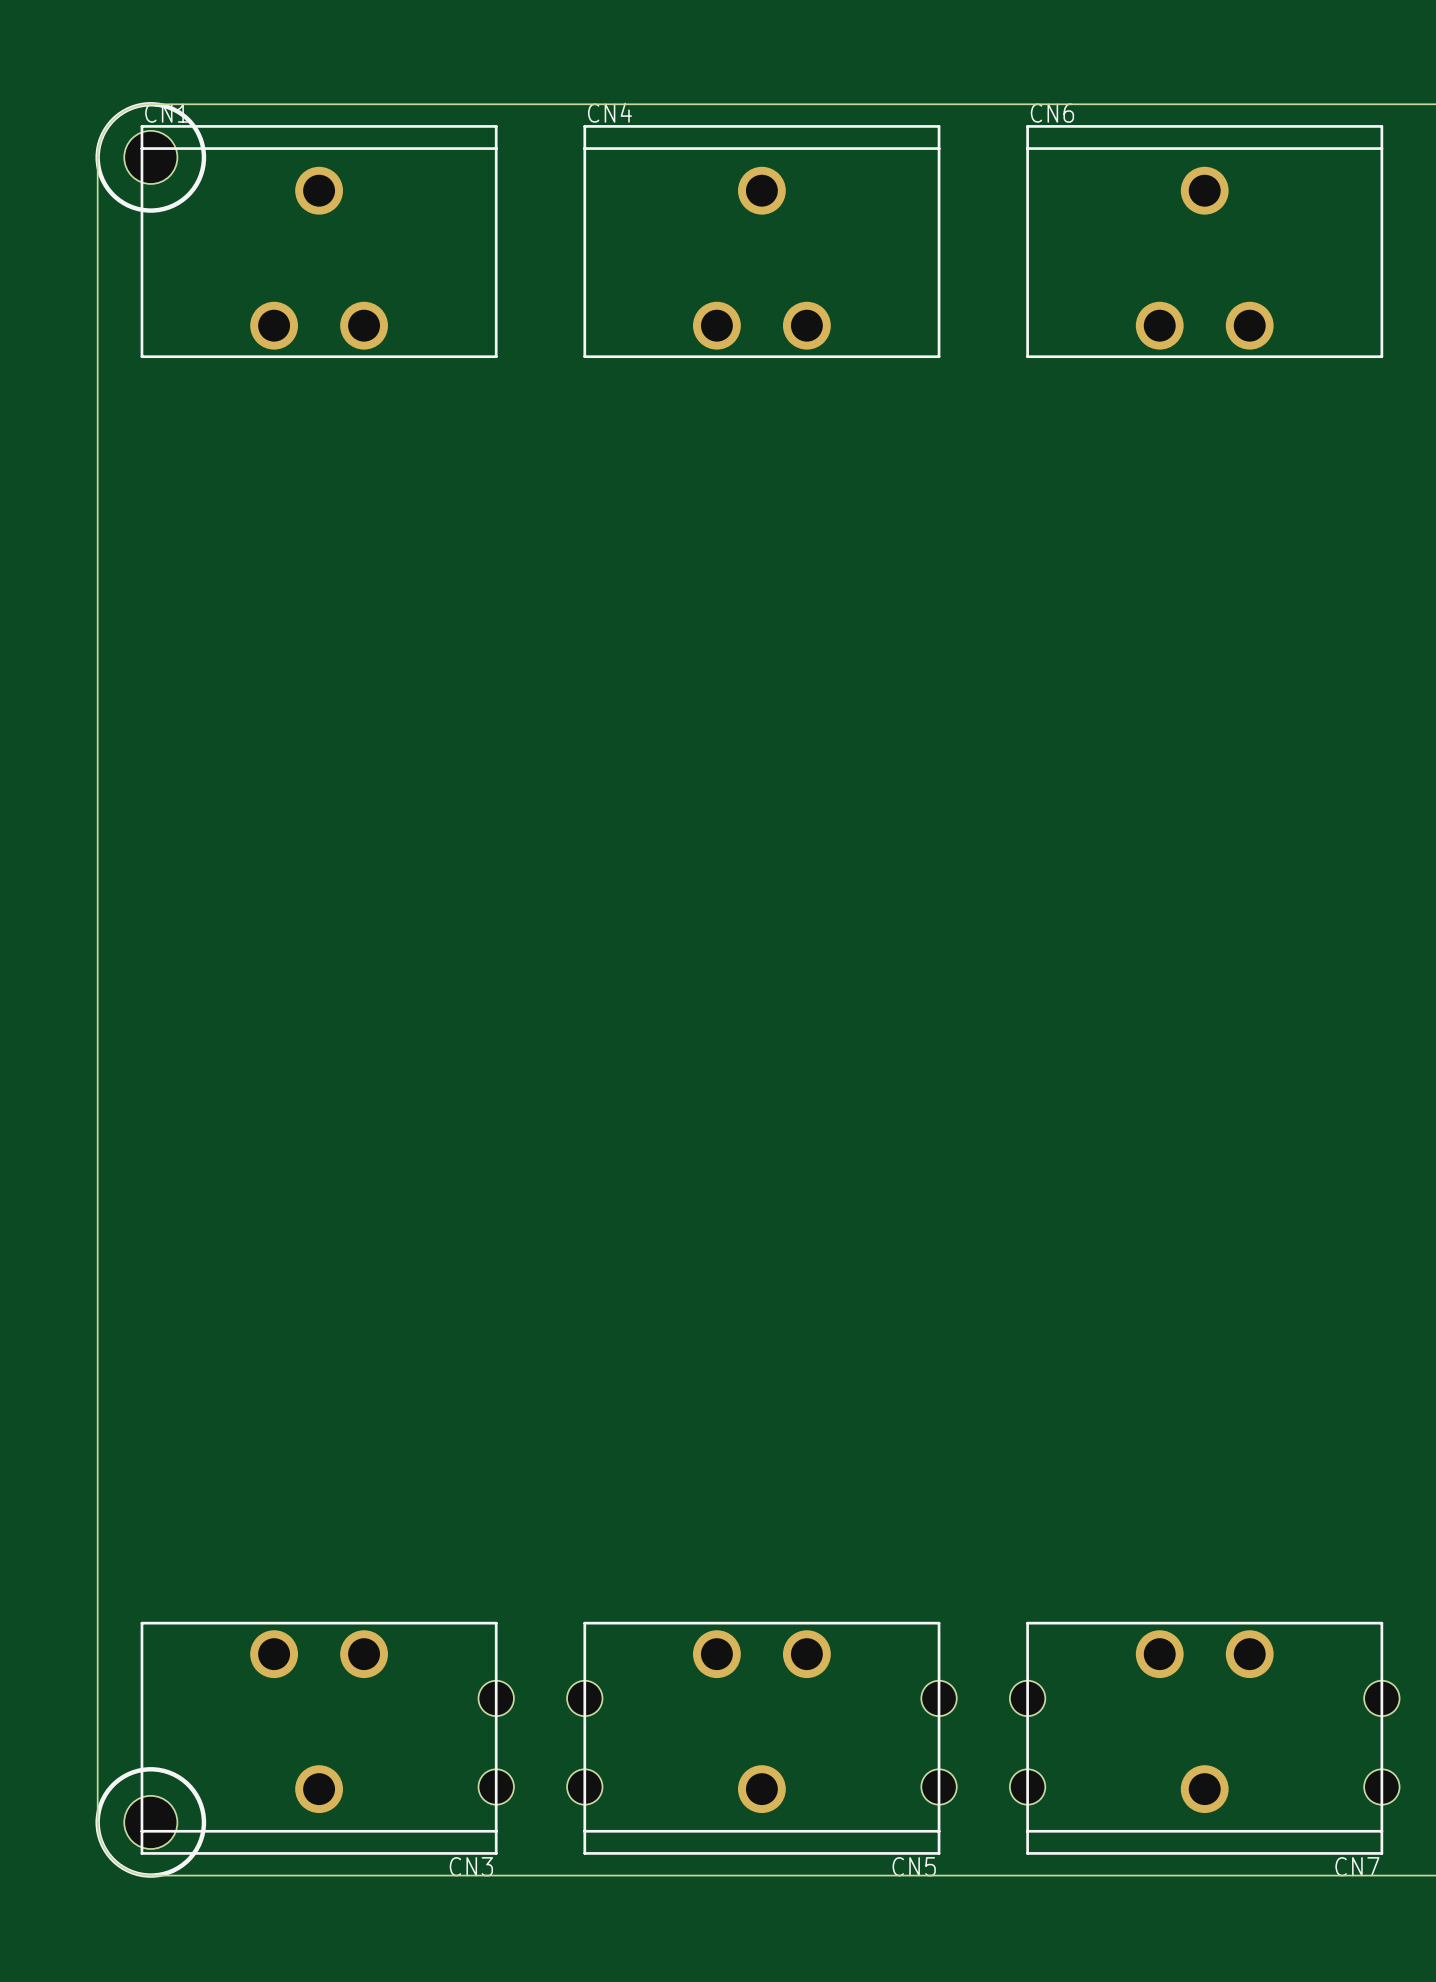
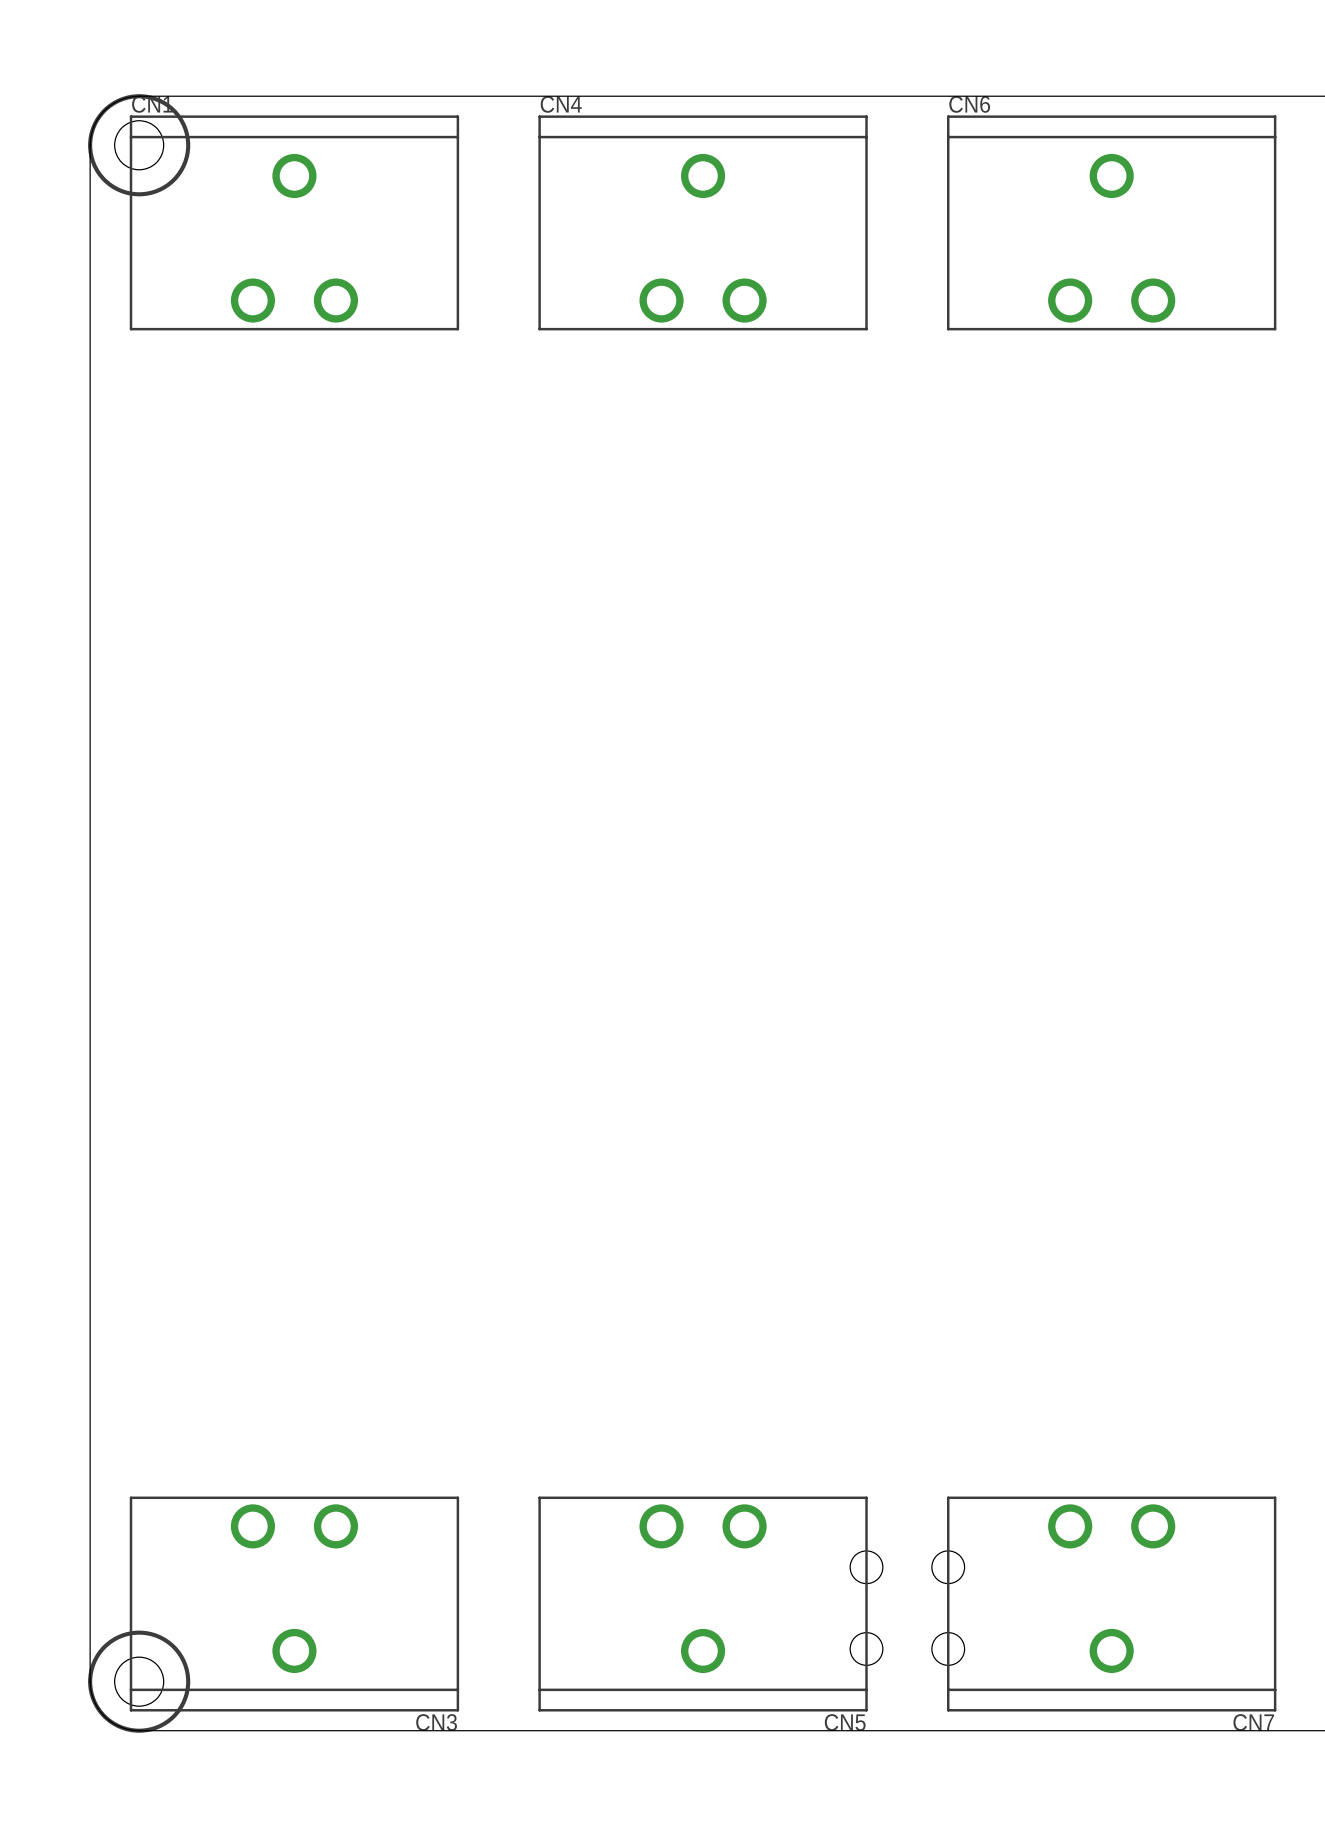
hole: (496, 1698) -> none
hole: (584, 1698) -> none
hole: (1381, 1698) -> none
hole: (496, 1787) -> none
hole: (584, 1787) -> none
hole: (1381, 1787) -> none

